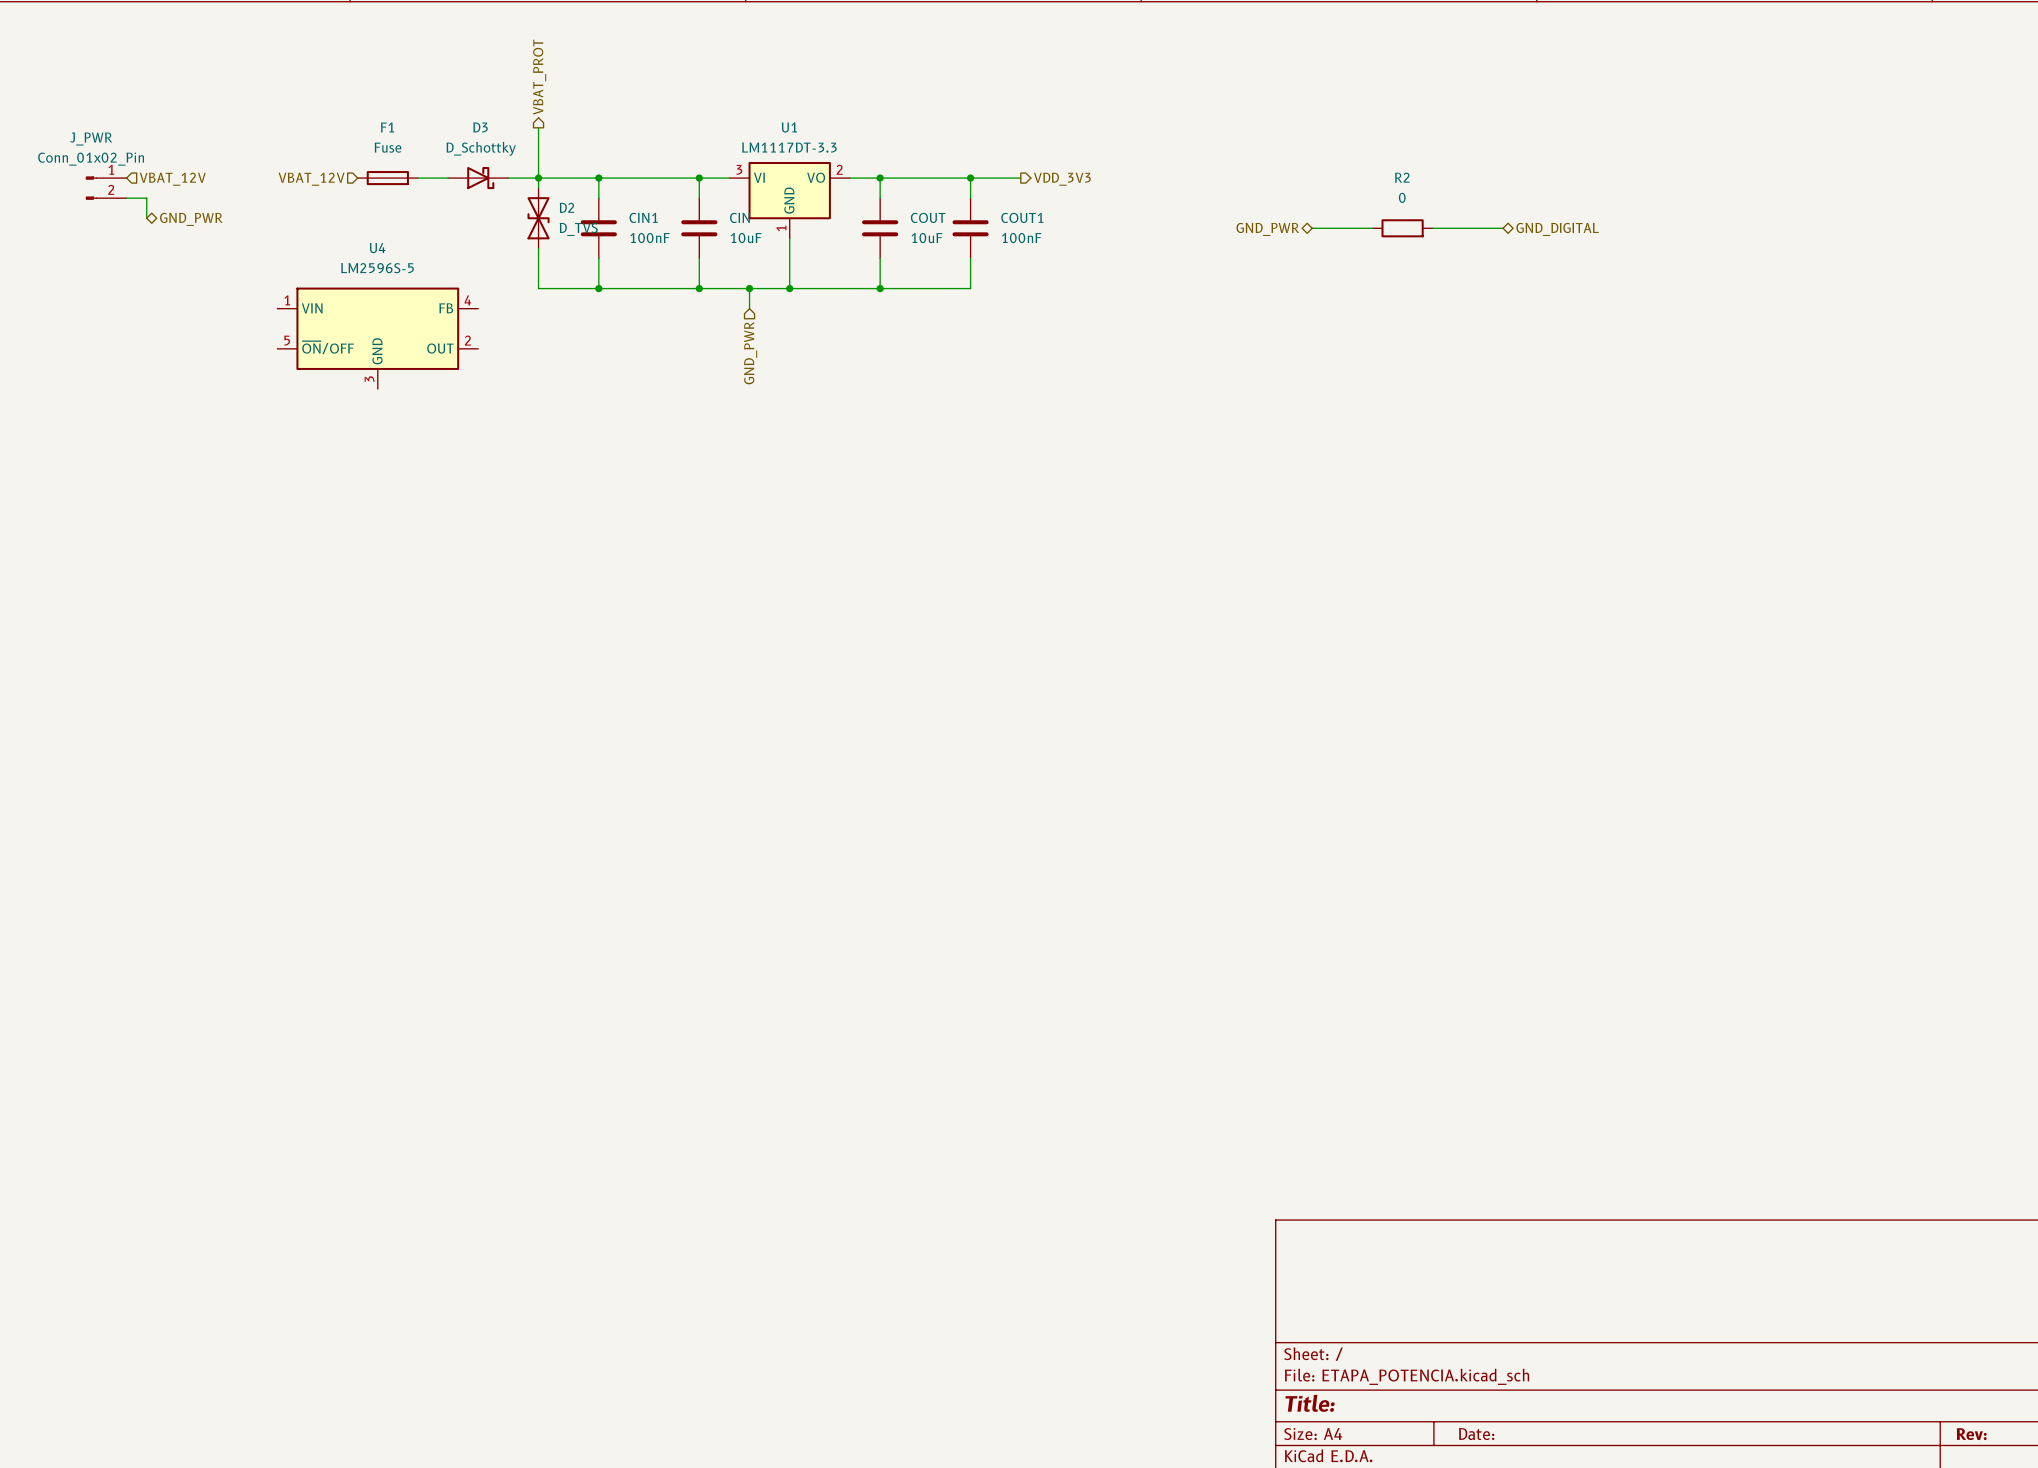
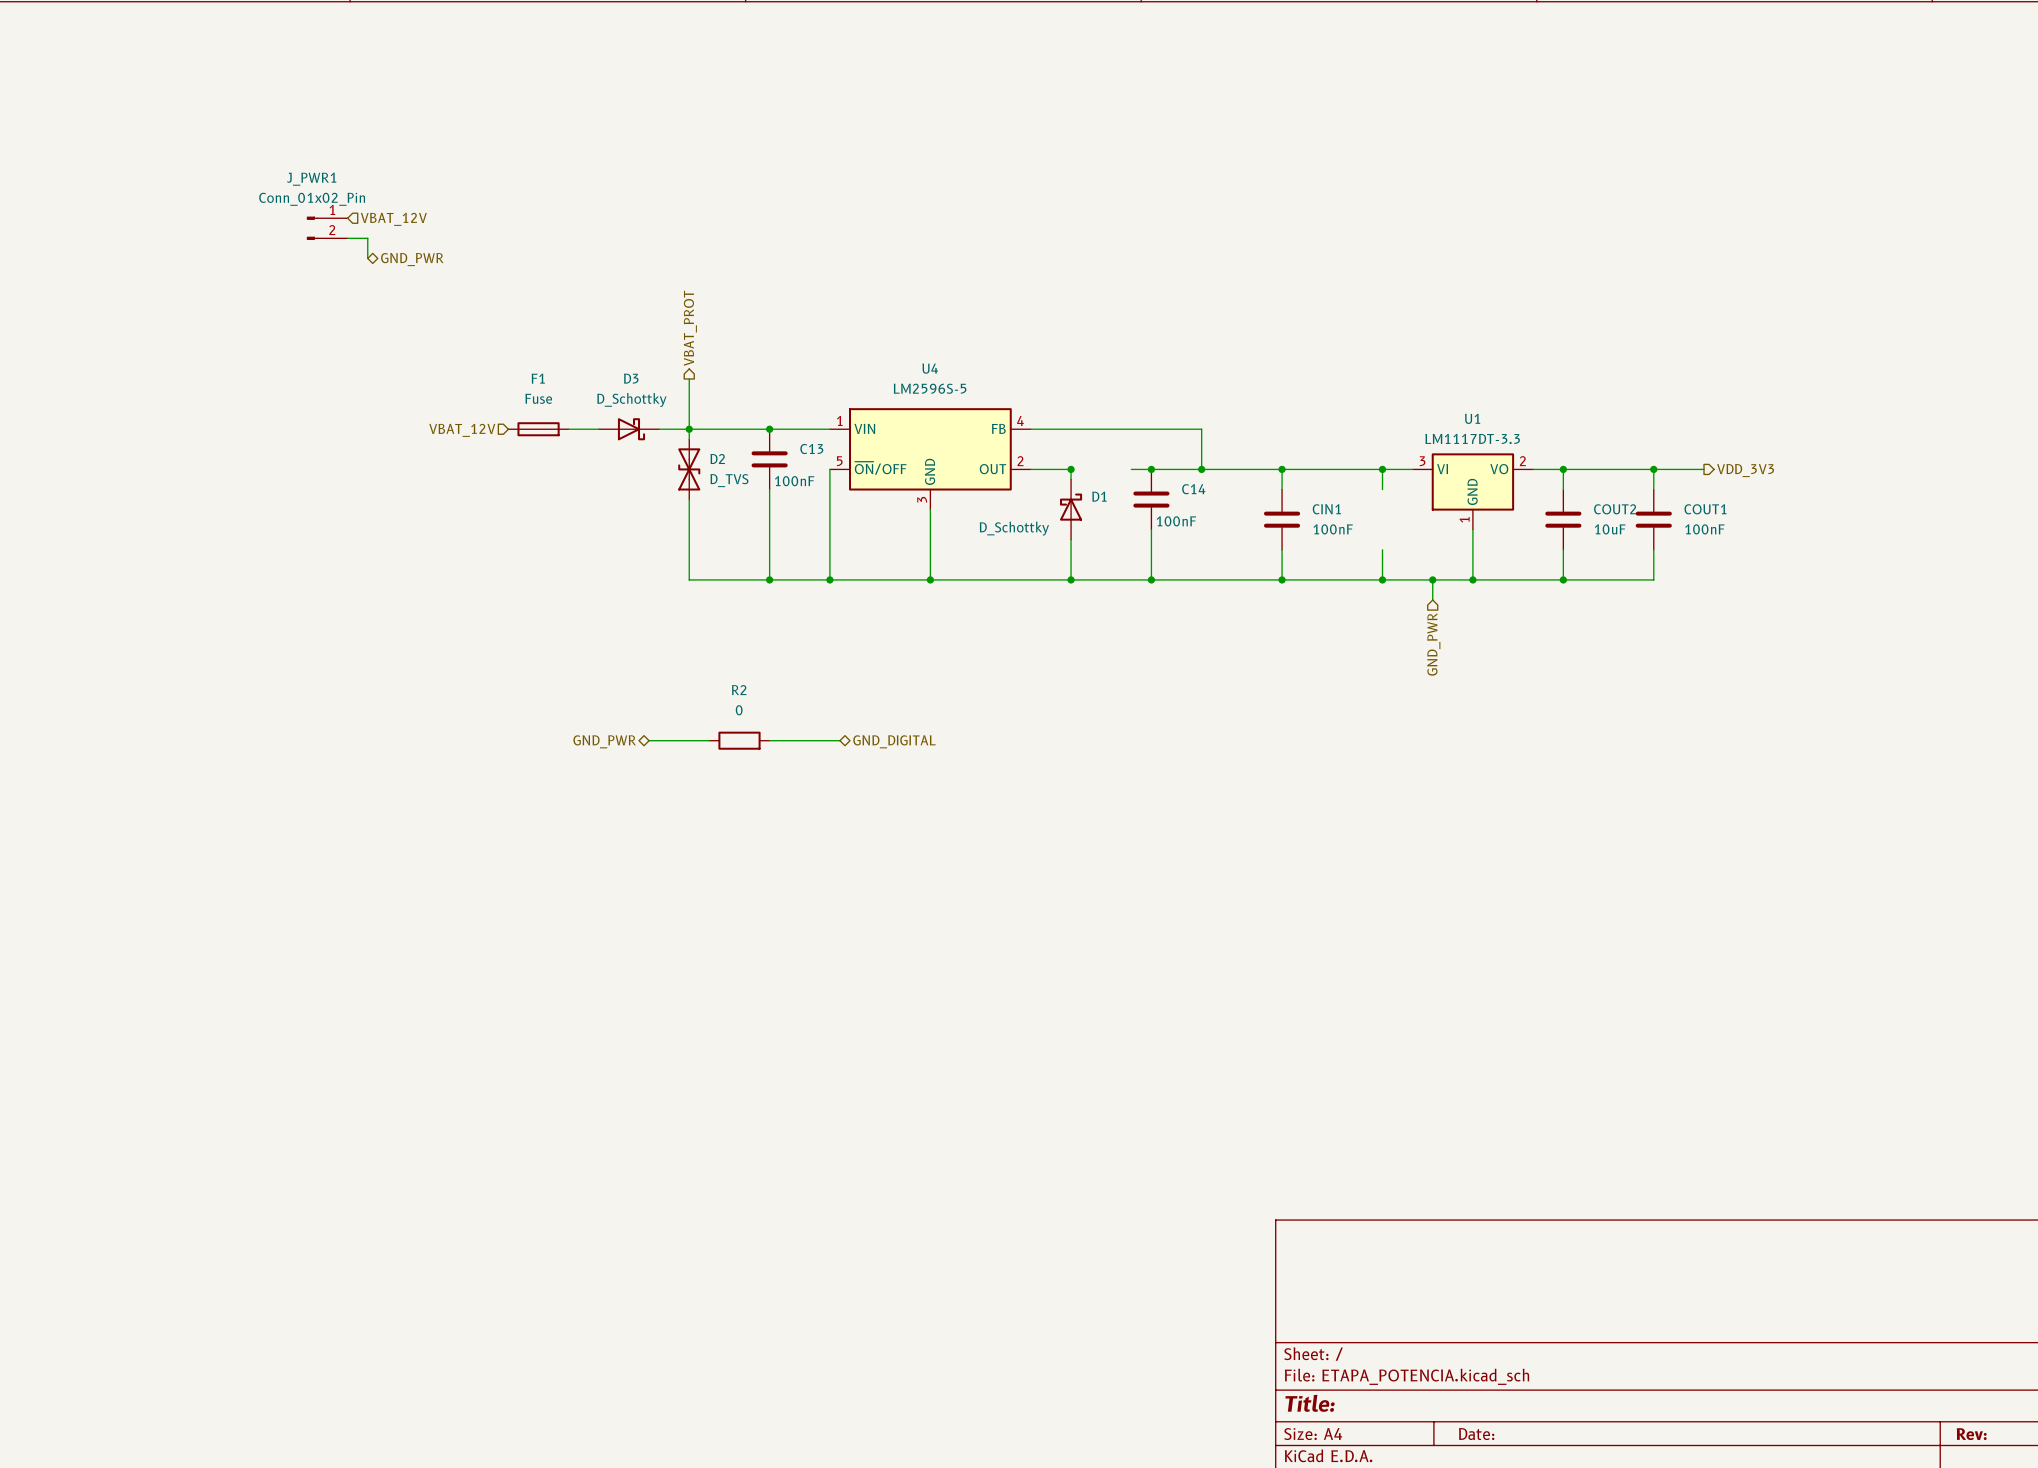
hierarchical label: VBAT_PROT (539, 77) -> none
wire: (538, 127) (538, 188) -> none
F1 position: (387, 178) -> (538, 429)
wire: (417, 178) (448, 178) -> none
D3 position: (478, 178) -> (628, 429)
wire: (508, 178) (729, 178) -> none
junction: (538, 178) -> none
wire: (598, 178) (598, 198) -> none
junction: (598, 178) -> none
wire: (699, 178) (699, 198) -> none
junction: (699, 178) -> none
wire: (850, 178) (1020, 178) -> none
wire: (880, 178) (880, 198) -> none
junction: (880, 178) -> none
wire: (970, 178) (970, 198) -> none
junction: (970, 178) -> none
hierarchical label: VBAT_12V (172, 179) -> none
hierarchical label rotation: 0° (311, 179) -> 180° (393, 219)
hierarchical label position: VBAT_12V (311, 179) -> VBAT_12V (393, 219)
hierarchical label: VDD_3V3 (1062, 179) -> none
J_PWR: Conn_01x02_Pin (106, 188) -> none
wire: (126, 198) (146, 198) (146, 218) -> none
U1 position: (789, 200) -> (1472, 491)
D2 position: (538, 218) -> (689, 469)
hierarchical label: GND_PWR (191, 219) -> none
J_PWR1: none -> Conn_01x02_Pin (327, 228)
CIN1 position: (598, 228) -> (1282, 519)
CIN: 10uF (699, 228) -> none
COUT: 10uF (880, 228) -> none
COUT1 position: (970, 228) -> (1653, 519)
wire: (1312, 228) (1372, 228) -> none
R2 position: (1402, 228) -> (739, 740)
wire: (1432, 228) (1503, 228) -> none
hierarchical label: GND_PWR (1267, 229) -> none
hierarchical label: GND_DIGITAL (1557, 229) -> none
wire: none -> (347, 238) (367, 238) (367, 258)
wire: (789, 238) (789, 288) -> none
wire: (538, 248) (538, 288) (970, 288) (970, 258) -> none
wire: (598, 258) (598, 288) -> none
wire: (699, 258) (699, 288) -> none
wire: (880, 258) (880, 288) -> none
hierarchical label: none -> GND_PWR (412, 259)
junction: (598, 288) -> none
junction: (699, 288) -> none
wire: (749, 288) (749, 308) -> none
junction: (749, 288) -> none
junction: (789, 288) -> none
junction: (880, 288) -> none
hierarchical label: none -> VBAT_PROT (690, 328)
U4 position: (377, 338) -> (930, 458)
hierarchical label: GND_PWR (750, 353) -> none
wire: none -> (689, 379) (689, 439)
wire: none -> (568, 429) (598, 429)
wire: none -> (659, 429) (829, 429)
junction: none -> (689, 429)
junction: none -> (769, 429)
wire: none -> (1030, 429) (1201, 429) (1201, 469)
hierarchical label: none -> VBAT_12V (462, 430)
C13: none -> 100nF (769, 459)
wire: none -> (829, 469) (829, 579)
wire: none -> (1030, 469) (1071, 469) (1071, 479)
junction: none -> (1071, 469)
wire: none -> (1131, 469) (1412, 469)
junction: none -> (1151, 469)
junction: none -> (1201, 469)
wire: none -> (1282, 469) (1282, 489)
junction: none -> (1282, 469)
wire: none -> (1382, 469) (1382, 489)
junction: none -> (1382, 469)
wire: none -> (1533, 469) (1704, 469)
wire: none -> (1563, 469) (1563, 489)
junction: none -> (1563, 469)
wire: none -> (1653, 469) (1653, 489)
junction: none -> (1653, 469)
hierarchical label: none -> VDD_3V3 (1745, 470)
wire: none -> (769, 489) (769, 579)
wire: none -> (689, 499) (689, 579) (1653, 579) (1653, 549)
C14: none -> 100nF (1151, 499)
wire: none -> (930, 509) (930, 579)
D1: none -> D_Schottky (1071, 509)
COUT2: none -> 10uF (1563, 519)
wire: none -> (1151, 529) (1151, 579)
wire: none -> (1472, 529) (1472, 579)
wire: none -> (1071, 539) (1071, 579)
wire: none -> (1282, 549) (1282, 579)
wire: none -> (1382, 549) (1382, 579)
wire: none -> (1563, 549) (1563, 579)
junction: none -> (769, 579)
junction: none -> (829, 579)
junction: none -> (930, 579)
junction: none -> (1071, 579)
junction: none -> (1151, 579)
junction: none -> (1282, 579)
junction: none -> (1382, 579)
wire: none -> (1432, 579) (1432, 600)
junction: none -> (1432, 579)
junction: none -> (1472, 579)
junction: none -> (1563, 579)
hierarchical label: none -> GND_PWR (1433, 644)
wire: none -> (649, 740) (709, 740)
wire: none -> (769, 740) (839, 740)
hierarchical label: none -> GND_PWR (604, 741)
hierarchical label: none -> GND_DIGITAL (894, 741)

